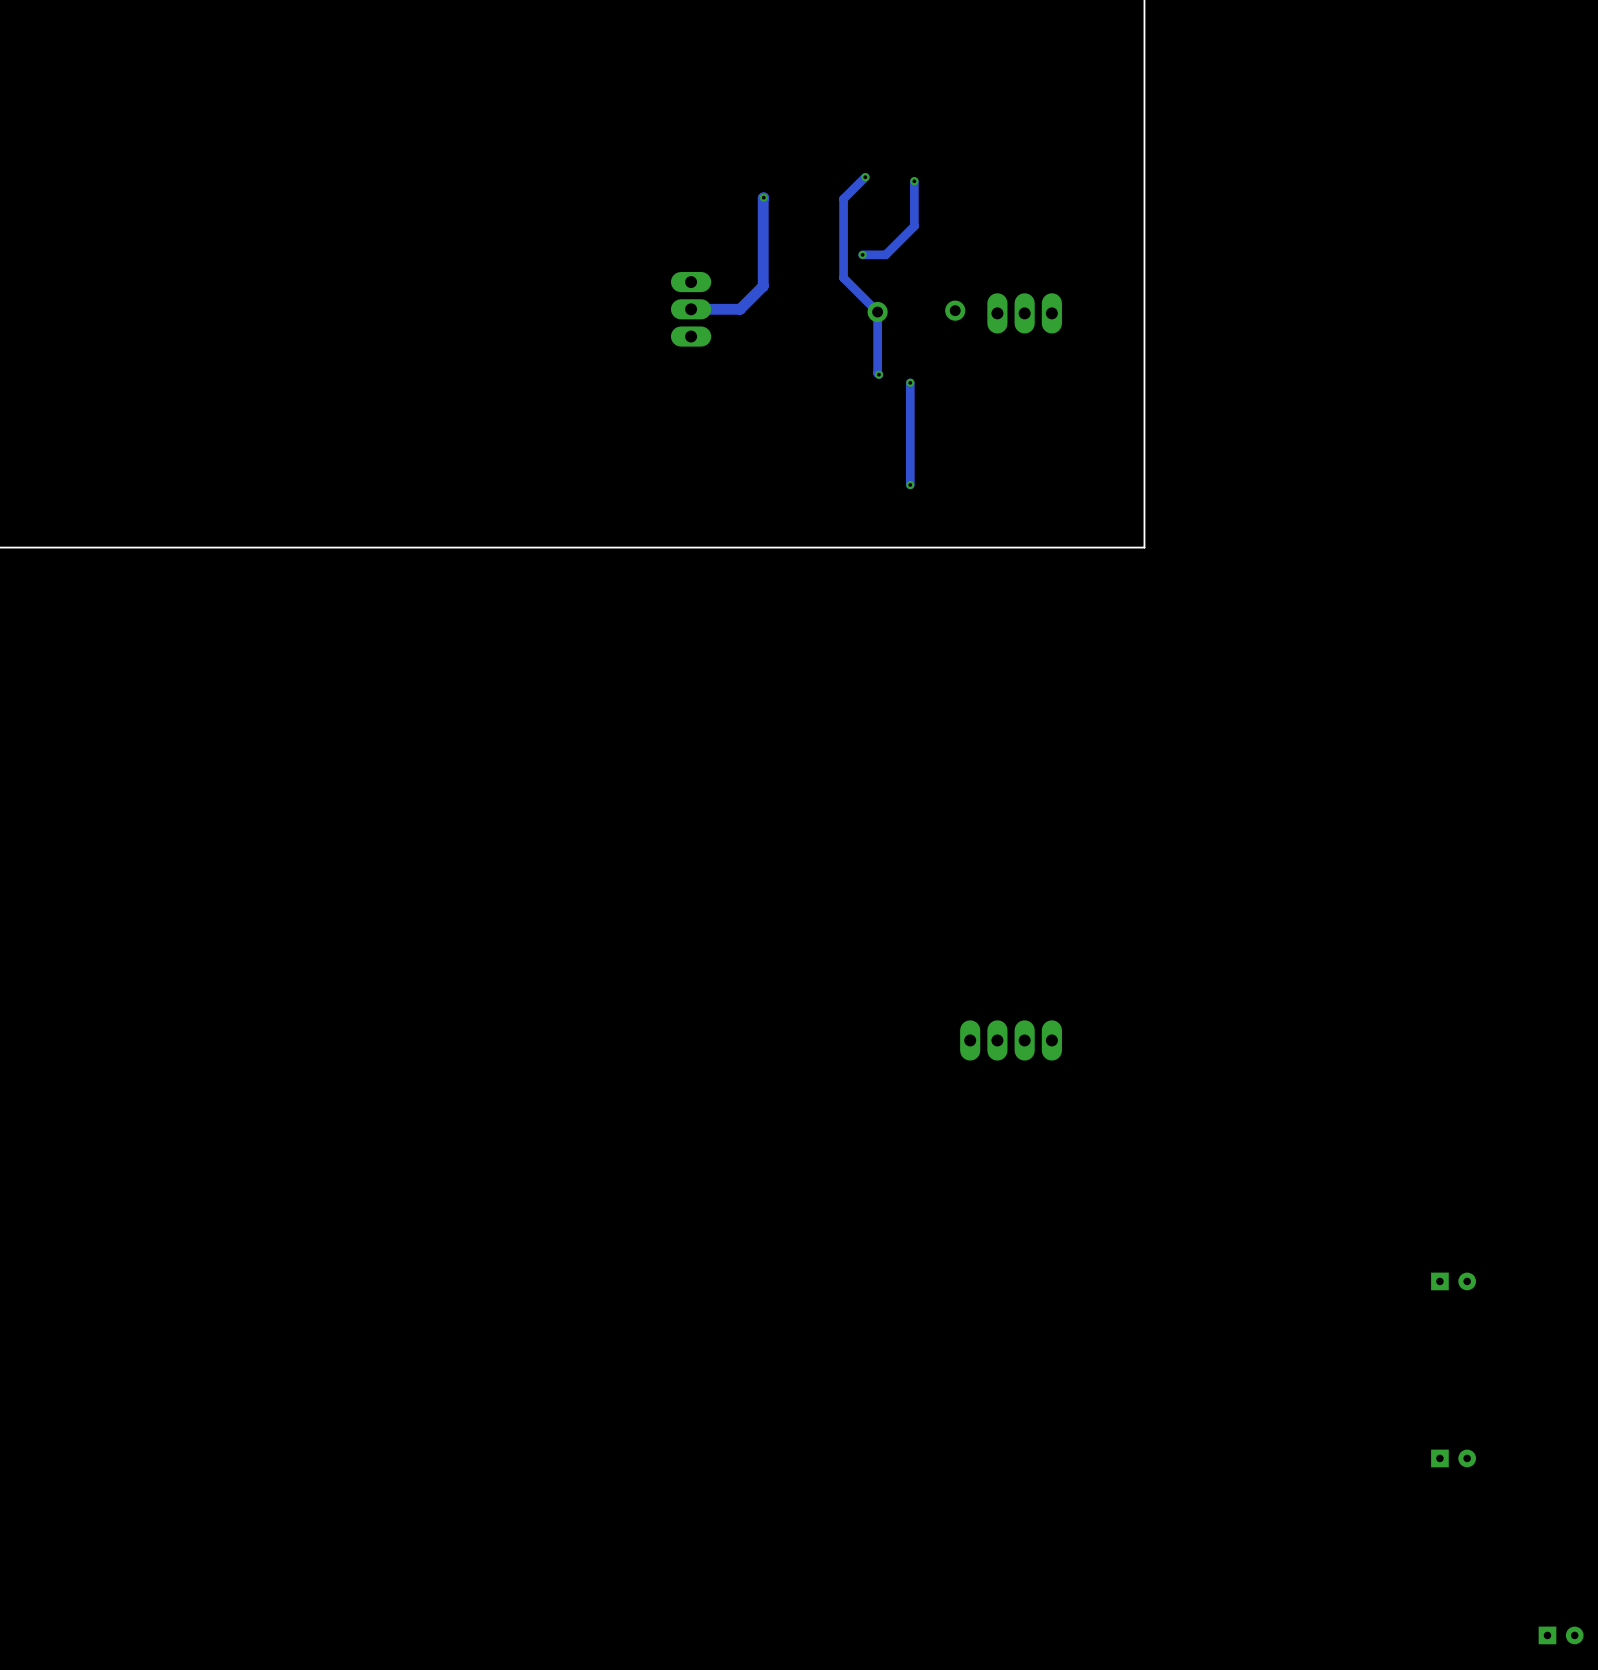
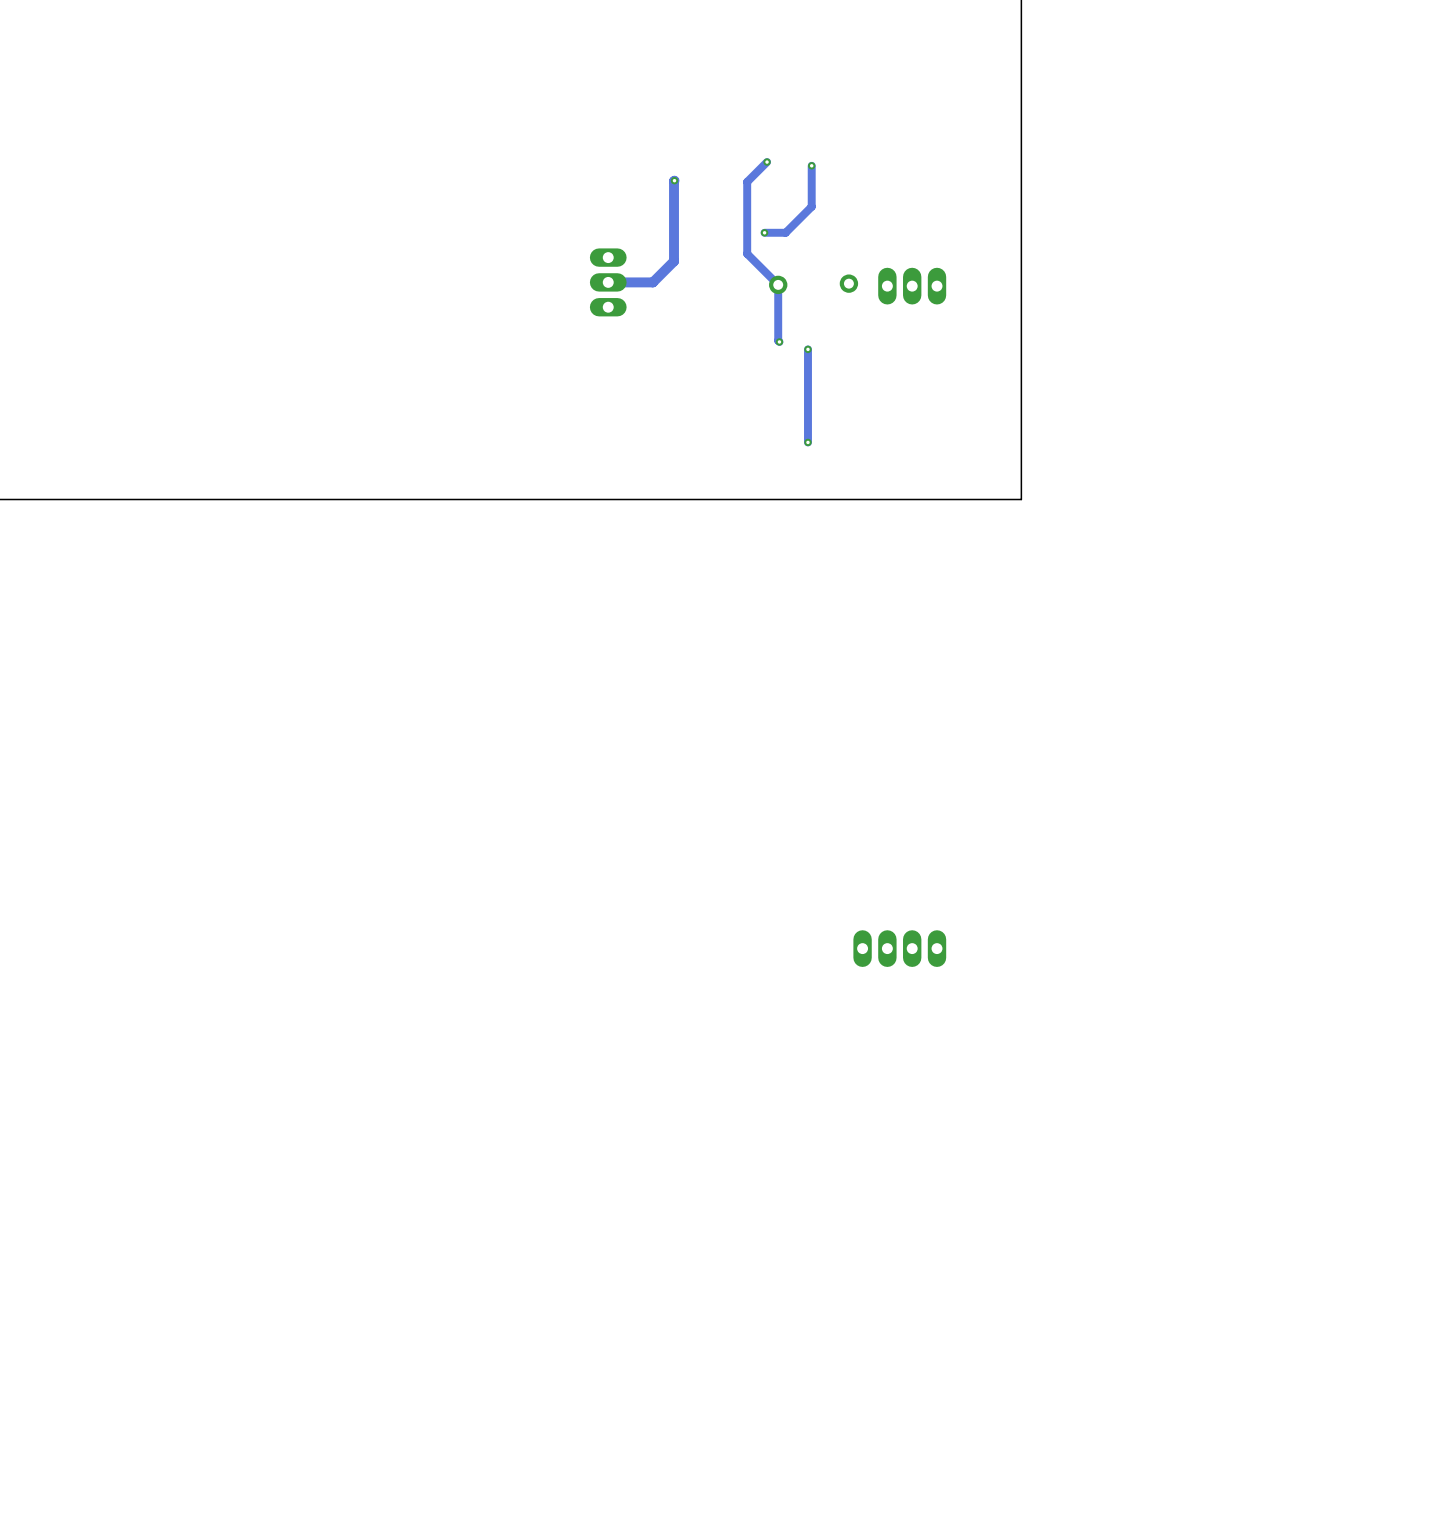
part: (1453, 1281) -> none
part: (1453, 1458) -> none
part: (1561, 1635) -> none

